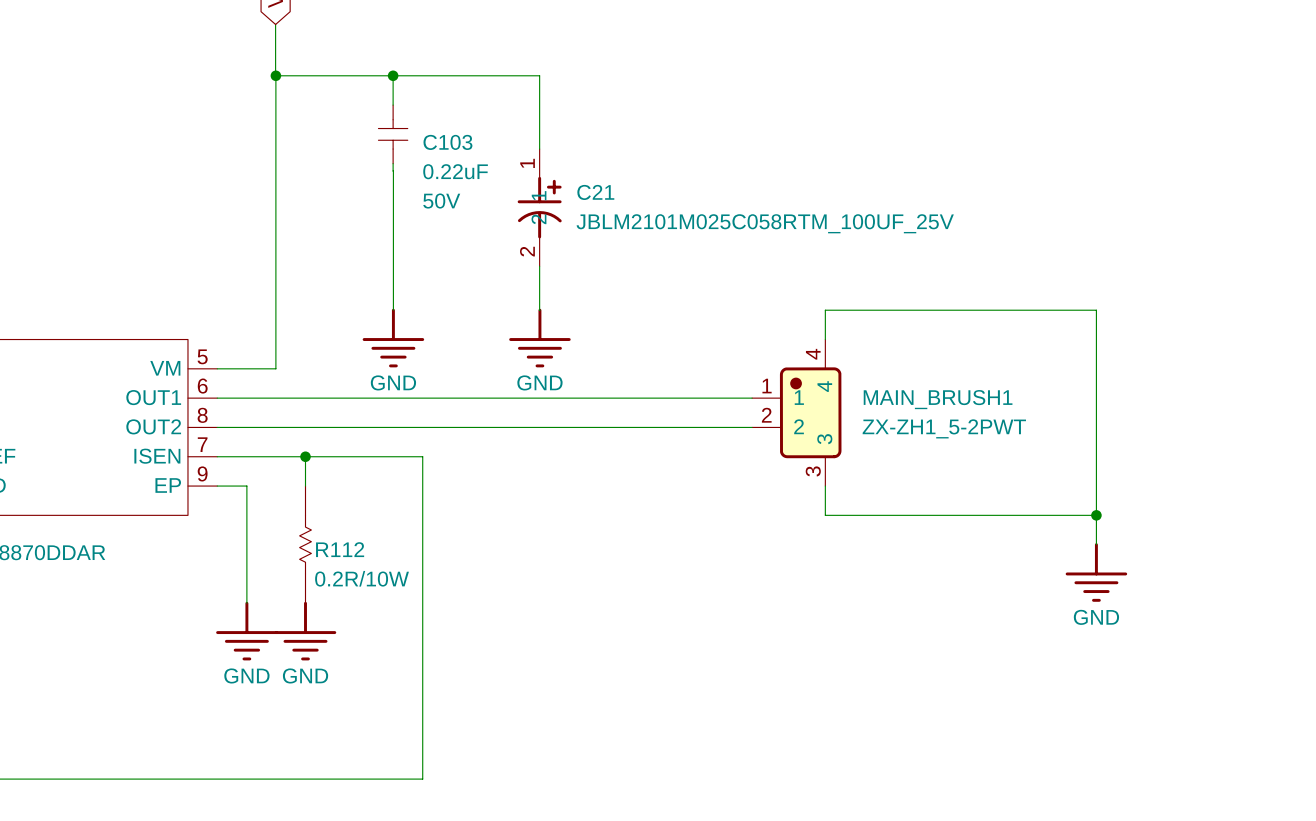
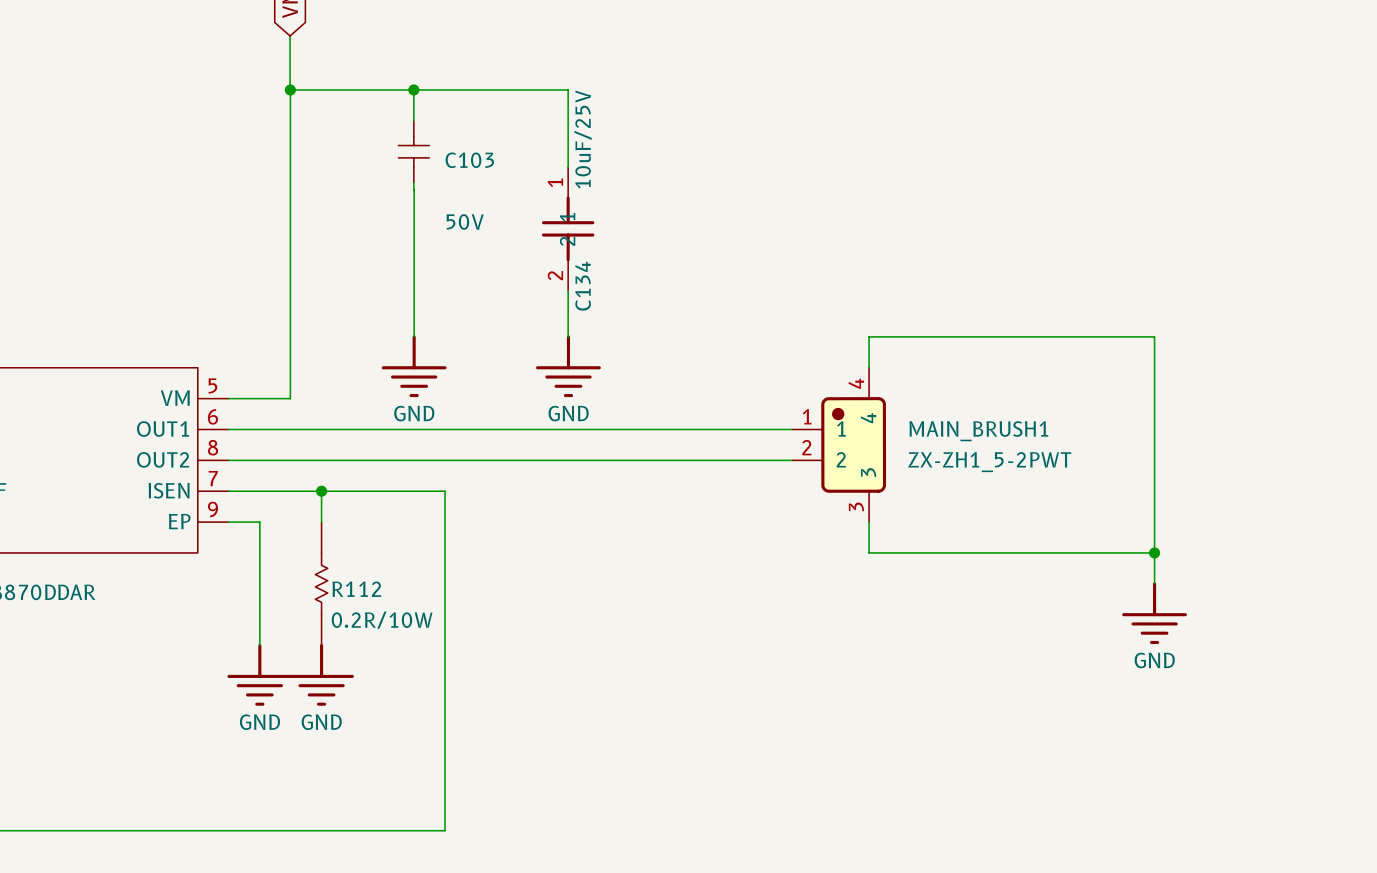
C103 value: 0.22uF (455, 171) -> none
C21: JBLM2101M025C058RTM_100UF_25V (539, 207) -> none
C134: none -> 10uF/25V (568, 228)

